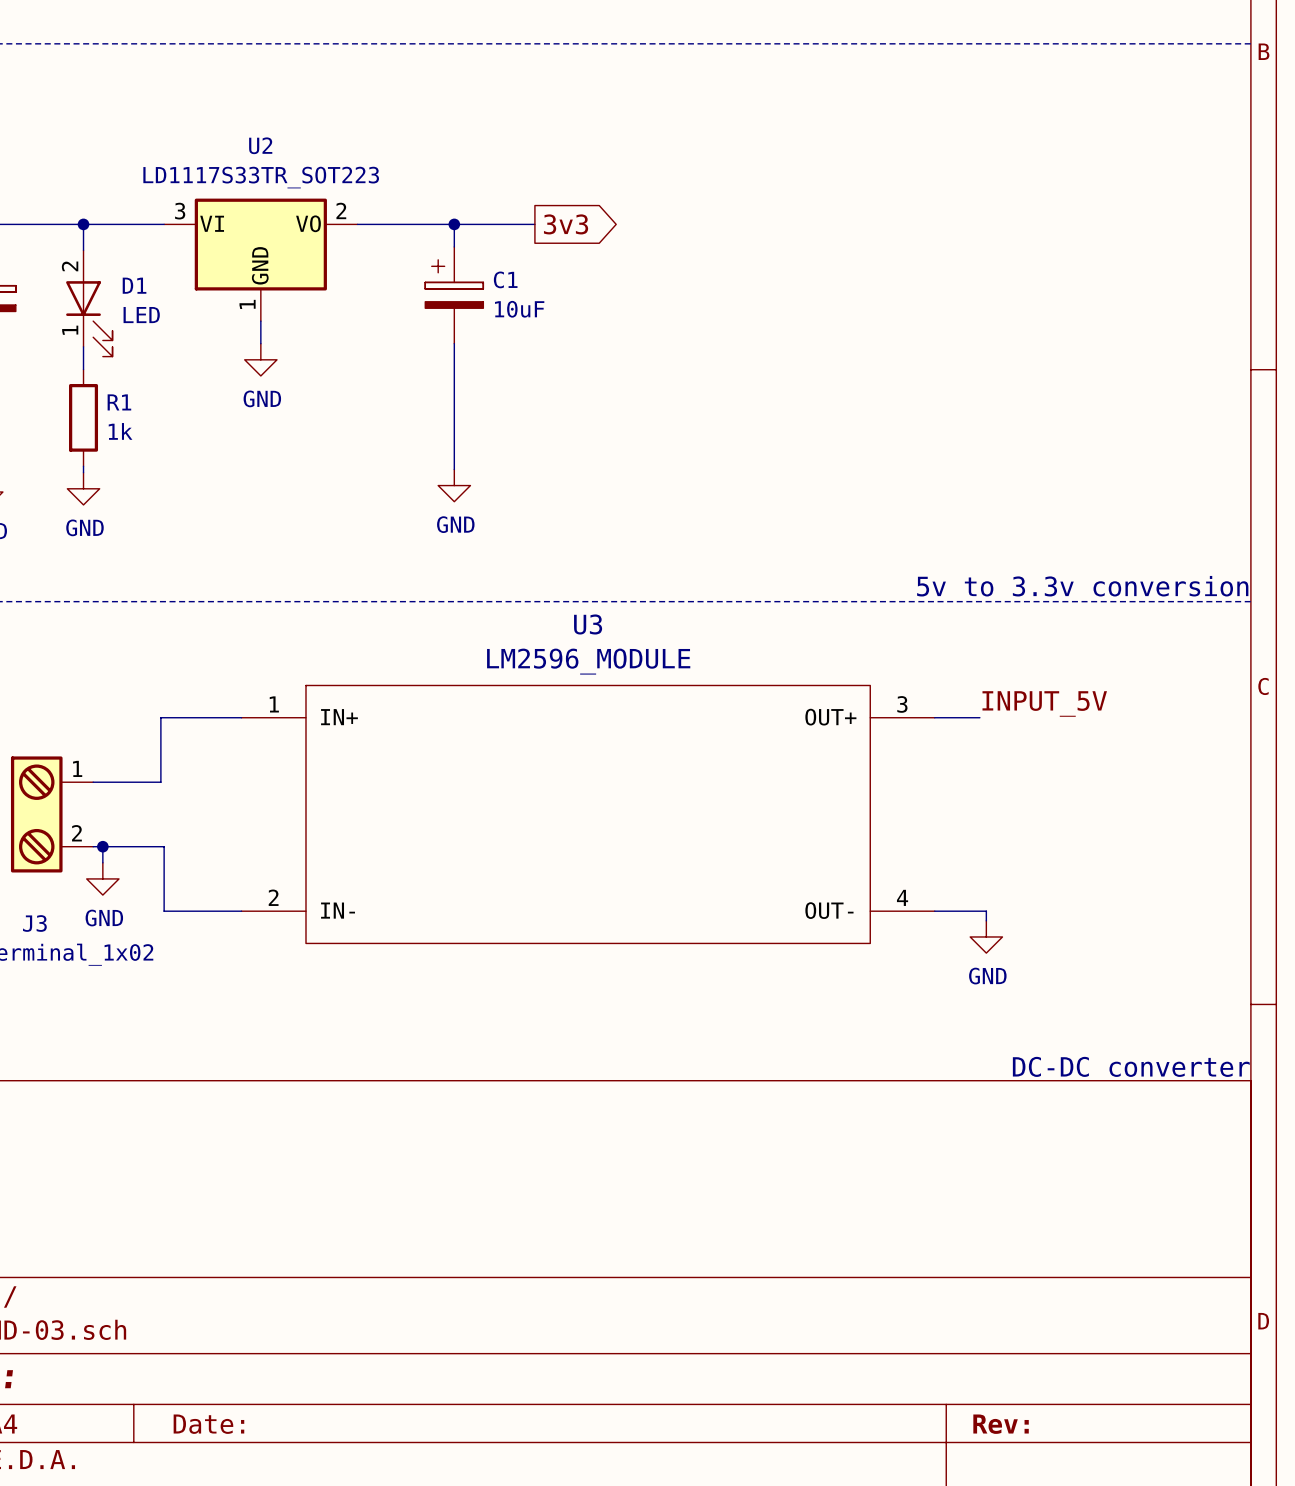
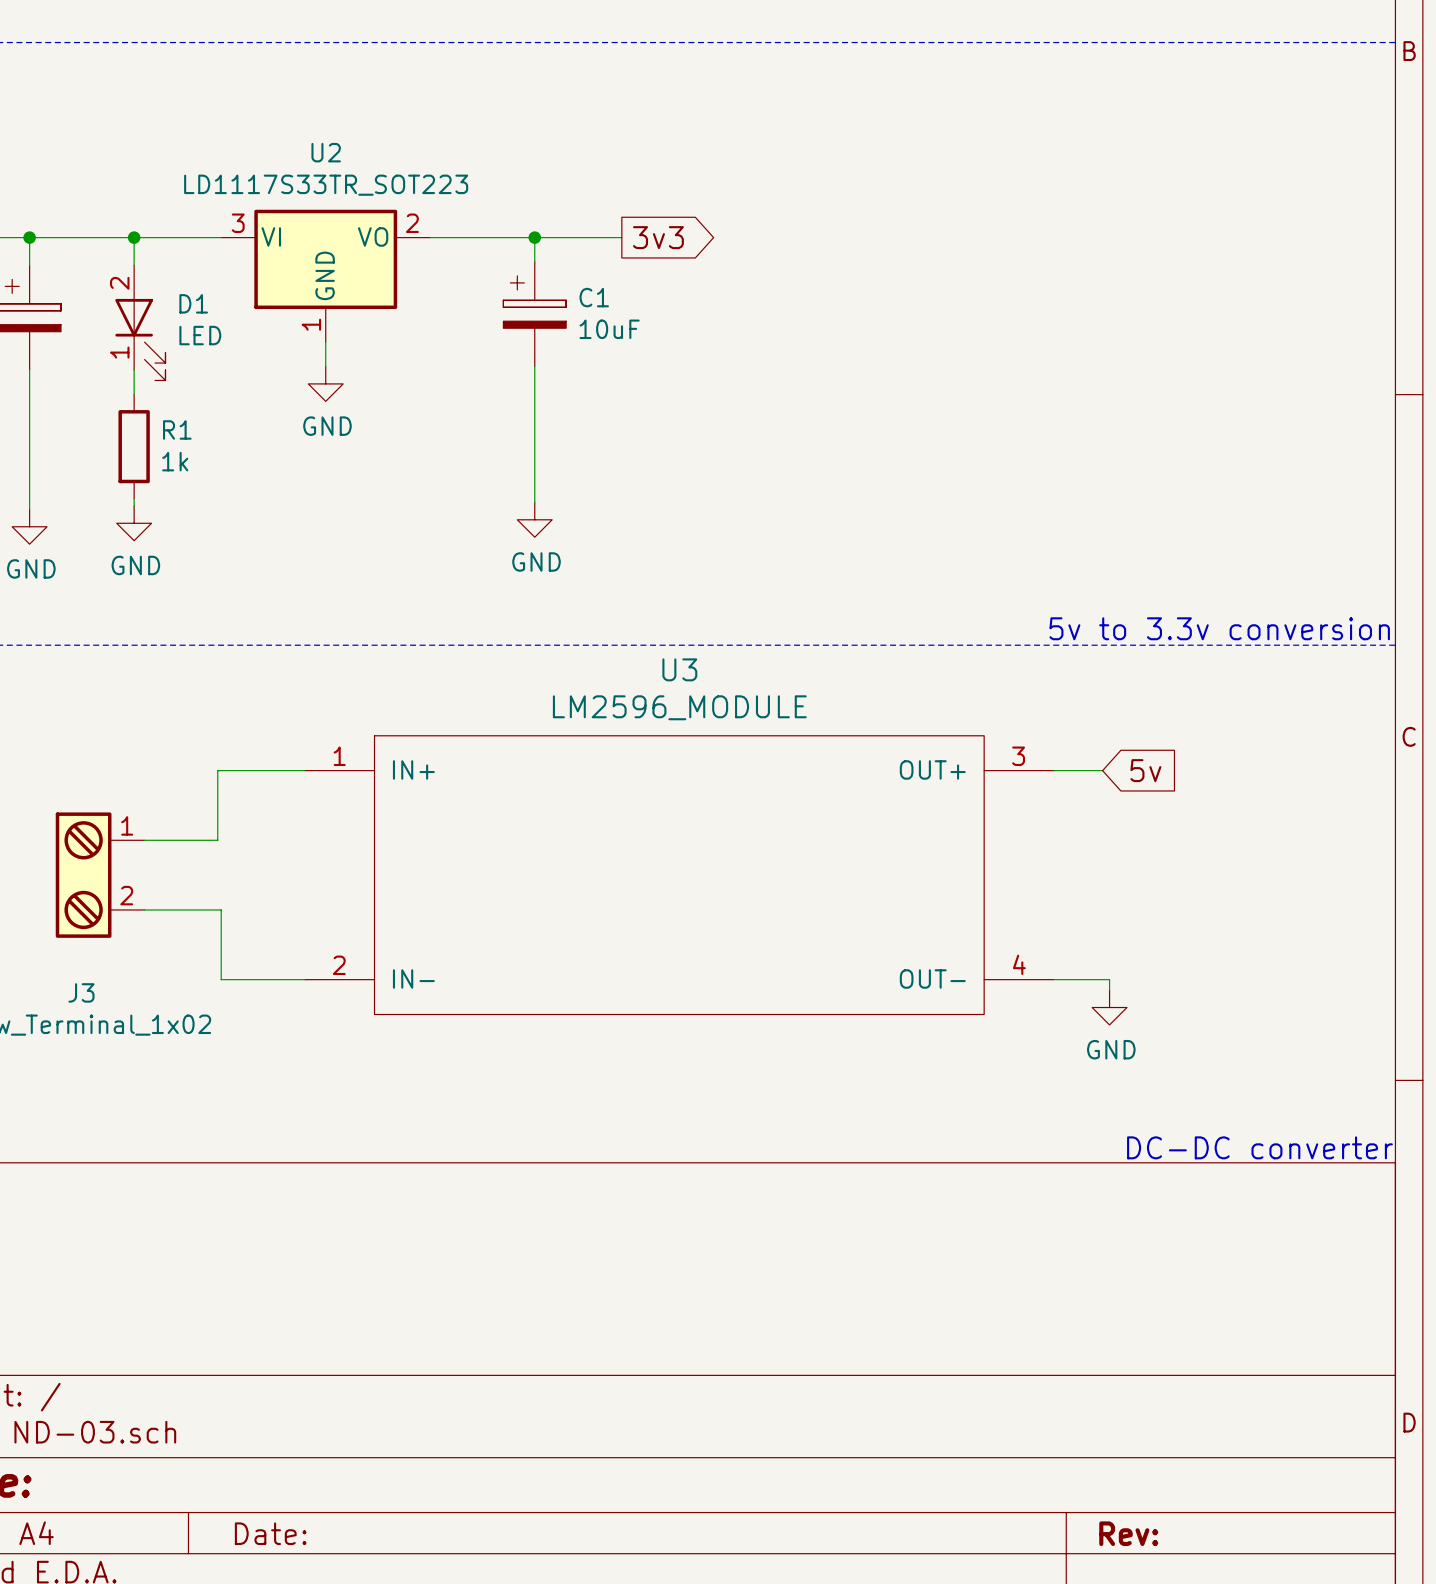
label: INPUT_5V (1044, 703) -> none
global label: none -> 5v (1145, 770)
wire: (102, 846) (102, 862) -> none
junction: (102, 846) -> none
power symbol: GND (102, 878) -> none

